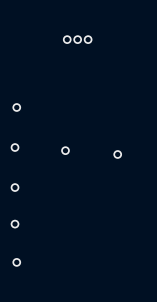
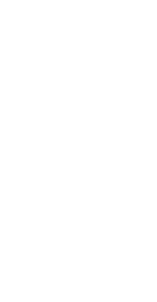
via: (67, 39) -> none
via: (77, 39) -> none
via: (88, 39) -> none
via: (16, 107) -> none
via: (15, 147) -> none
via: (65, 150) -> none
via: (117, 154) -> none
via: (15, 187) -> none
via: (15, 224) -> none
via: (16, 262) -> none

